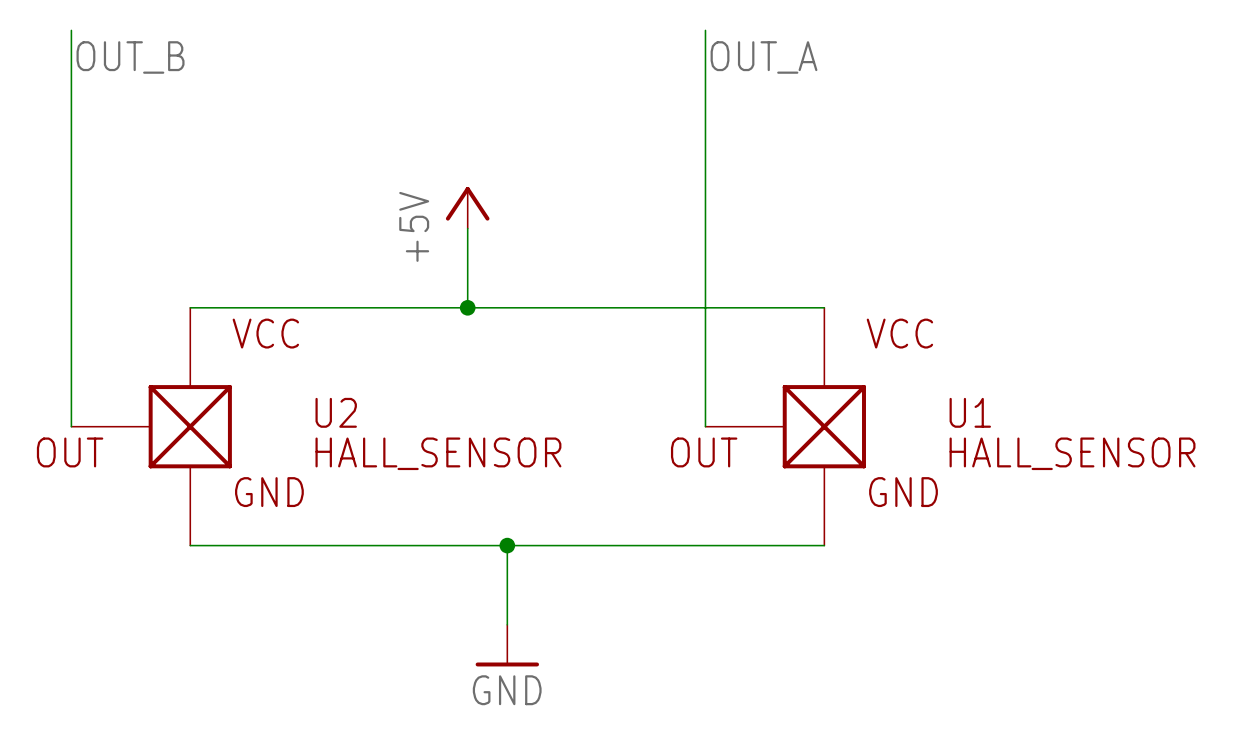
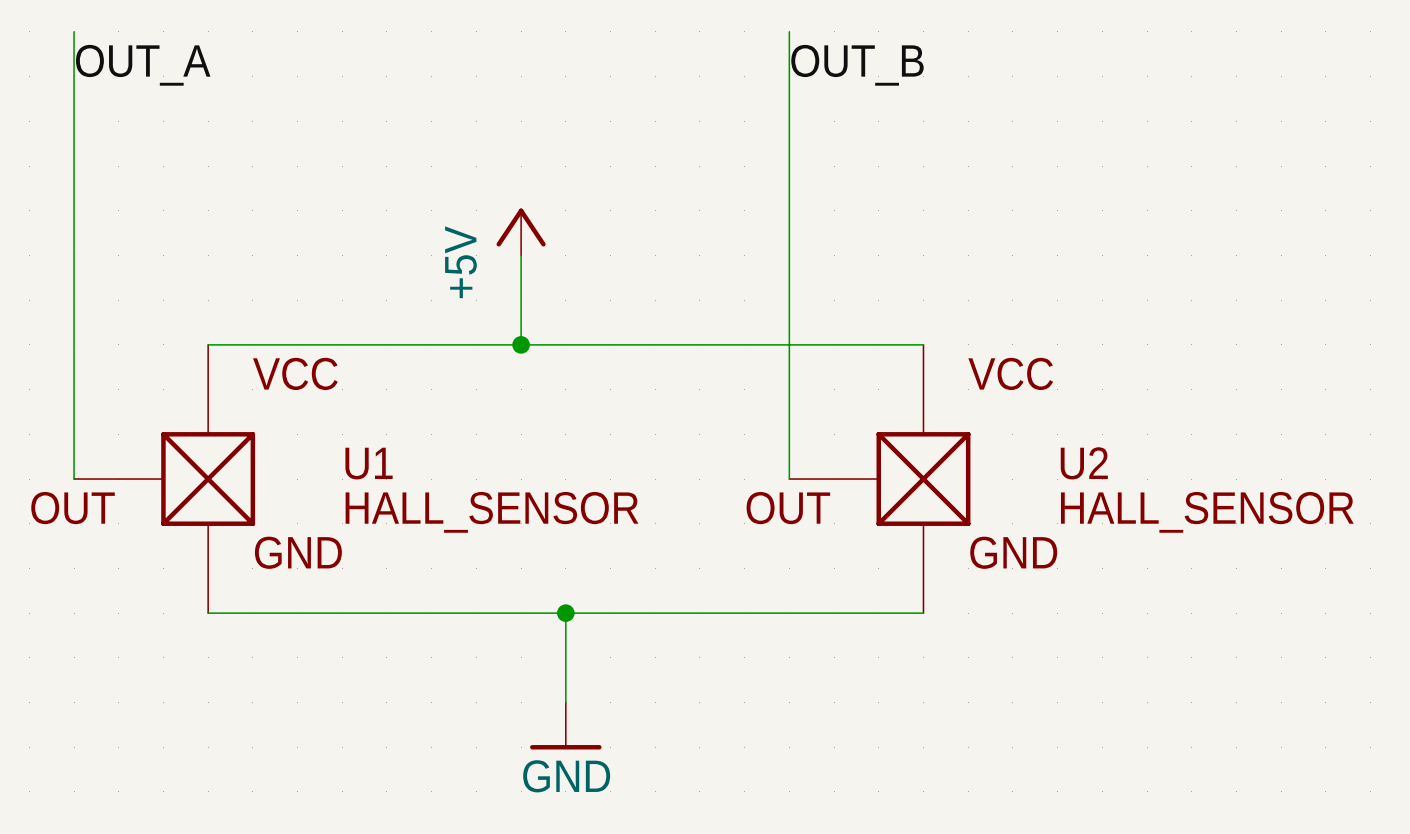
label: OUT_B (130, 57) -> OUT_A (143, 65)
label: OUT_A (764, 57) -> OUT_B (857, 65)
U2 name: U2 (336, 412) -> U1 (369, 463)
U1 name: U1 (970, 412) -> U2 (1084, 463)

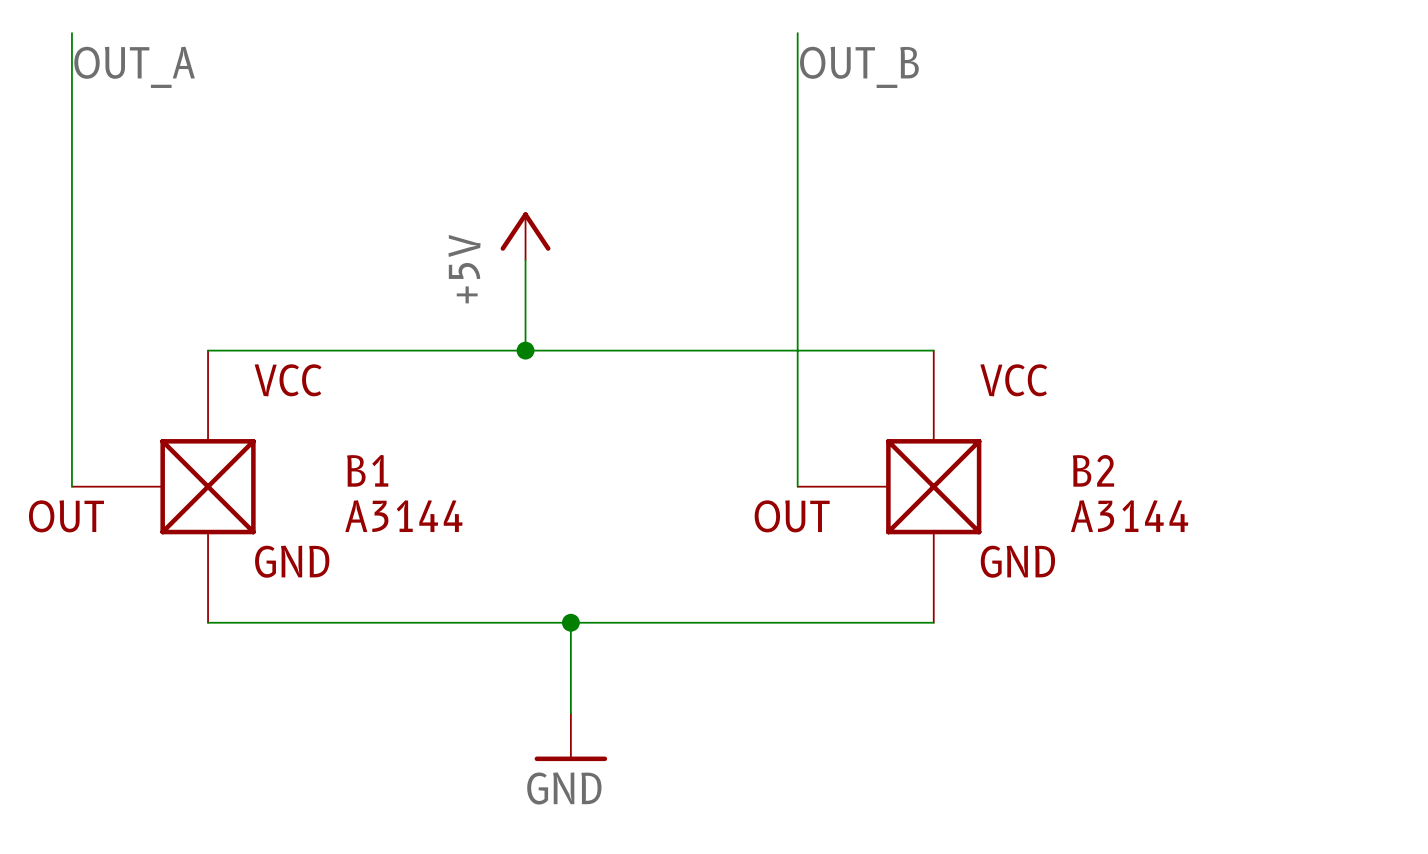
U1 name: U1 (369, 463) -> B1 (367, 470)
U2 name: U2 (1084, 463) -> B2 (1093, 470)
U1 value: HALL_SENSOR (492, 512) -> A3144 (403, 516)
U2 value: HALL_SENSOR (1207, 512) -> A3144 (1129, 516)

